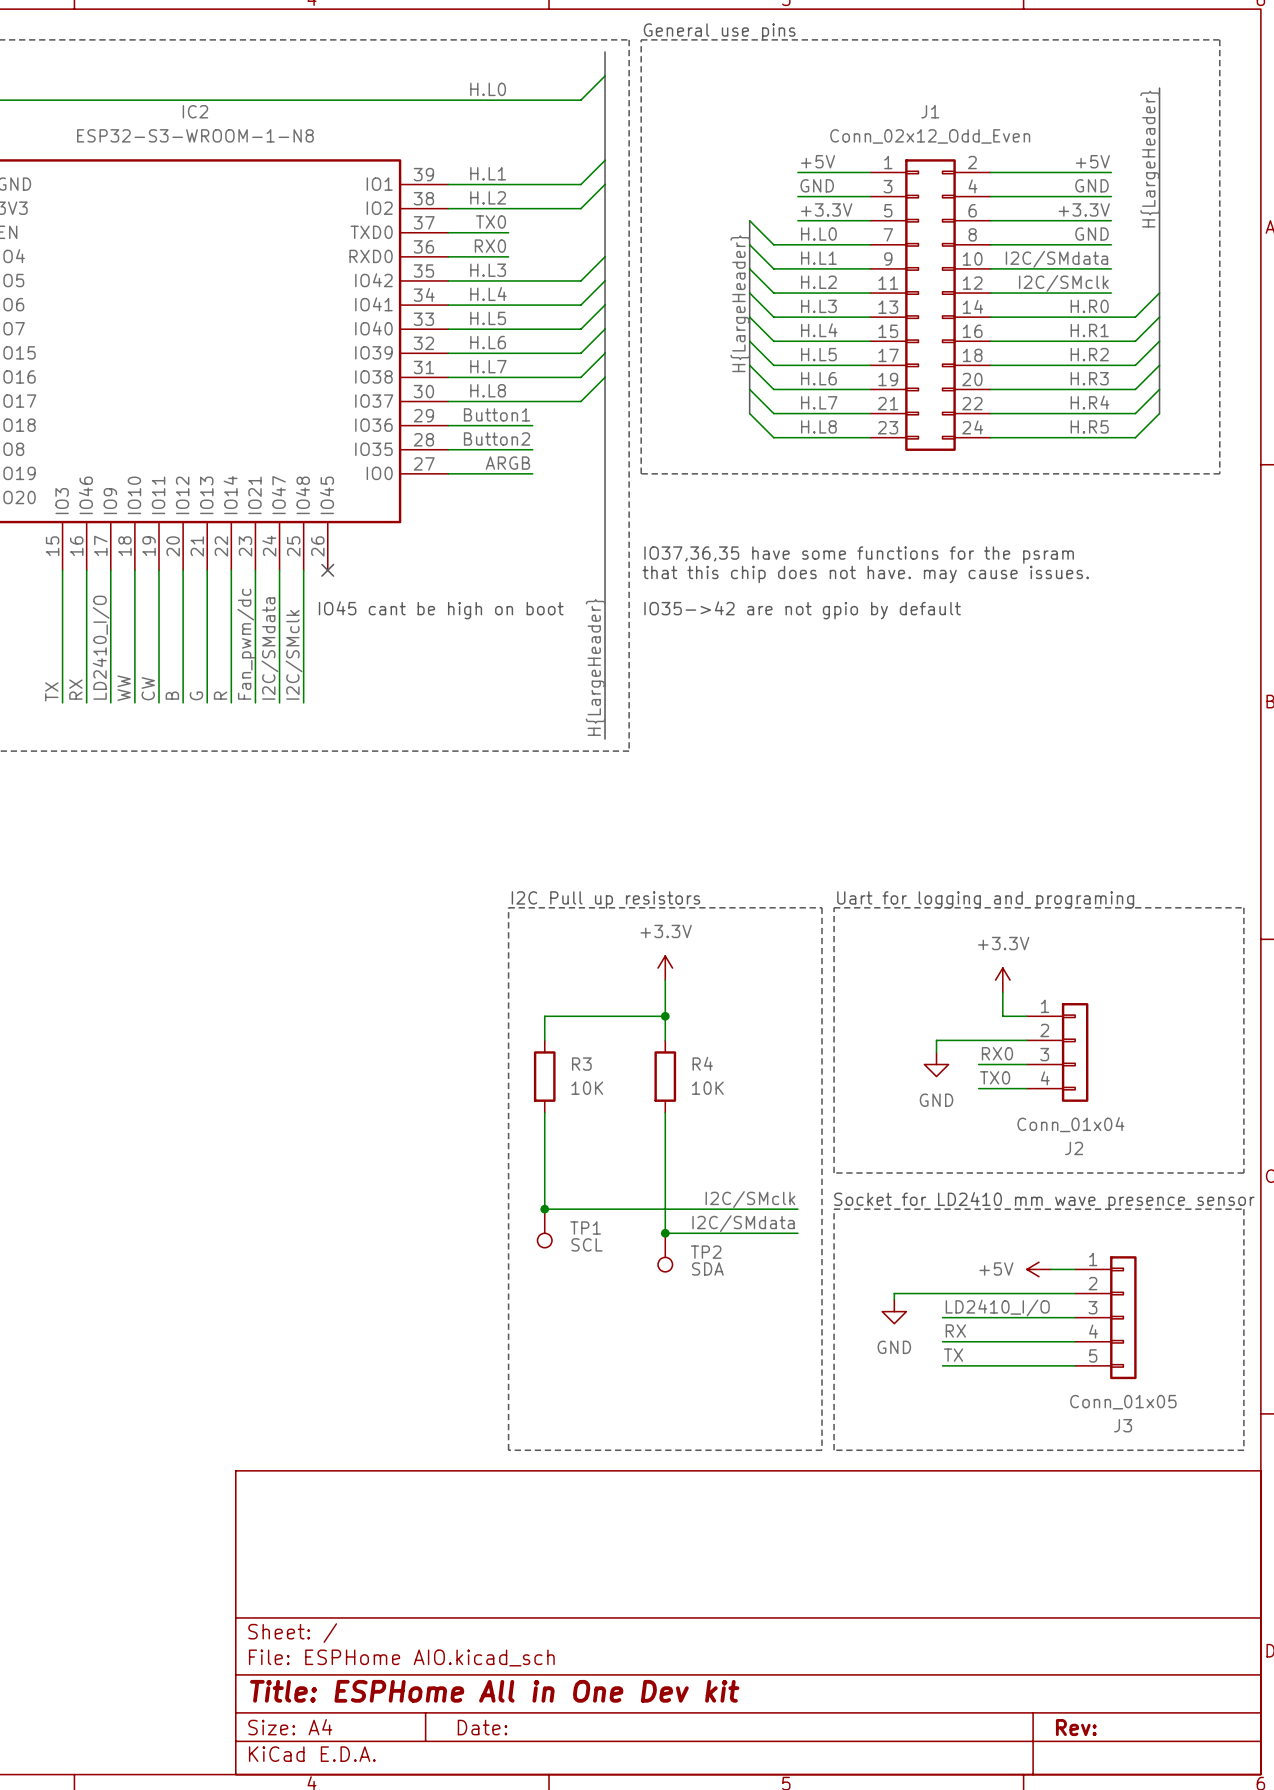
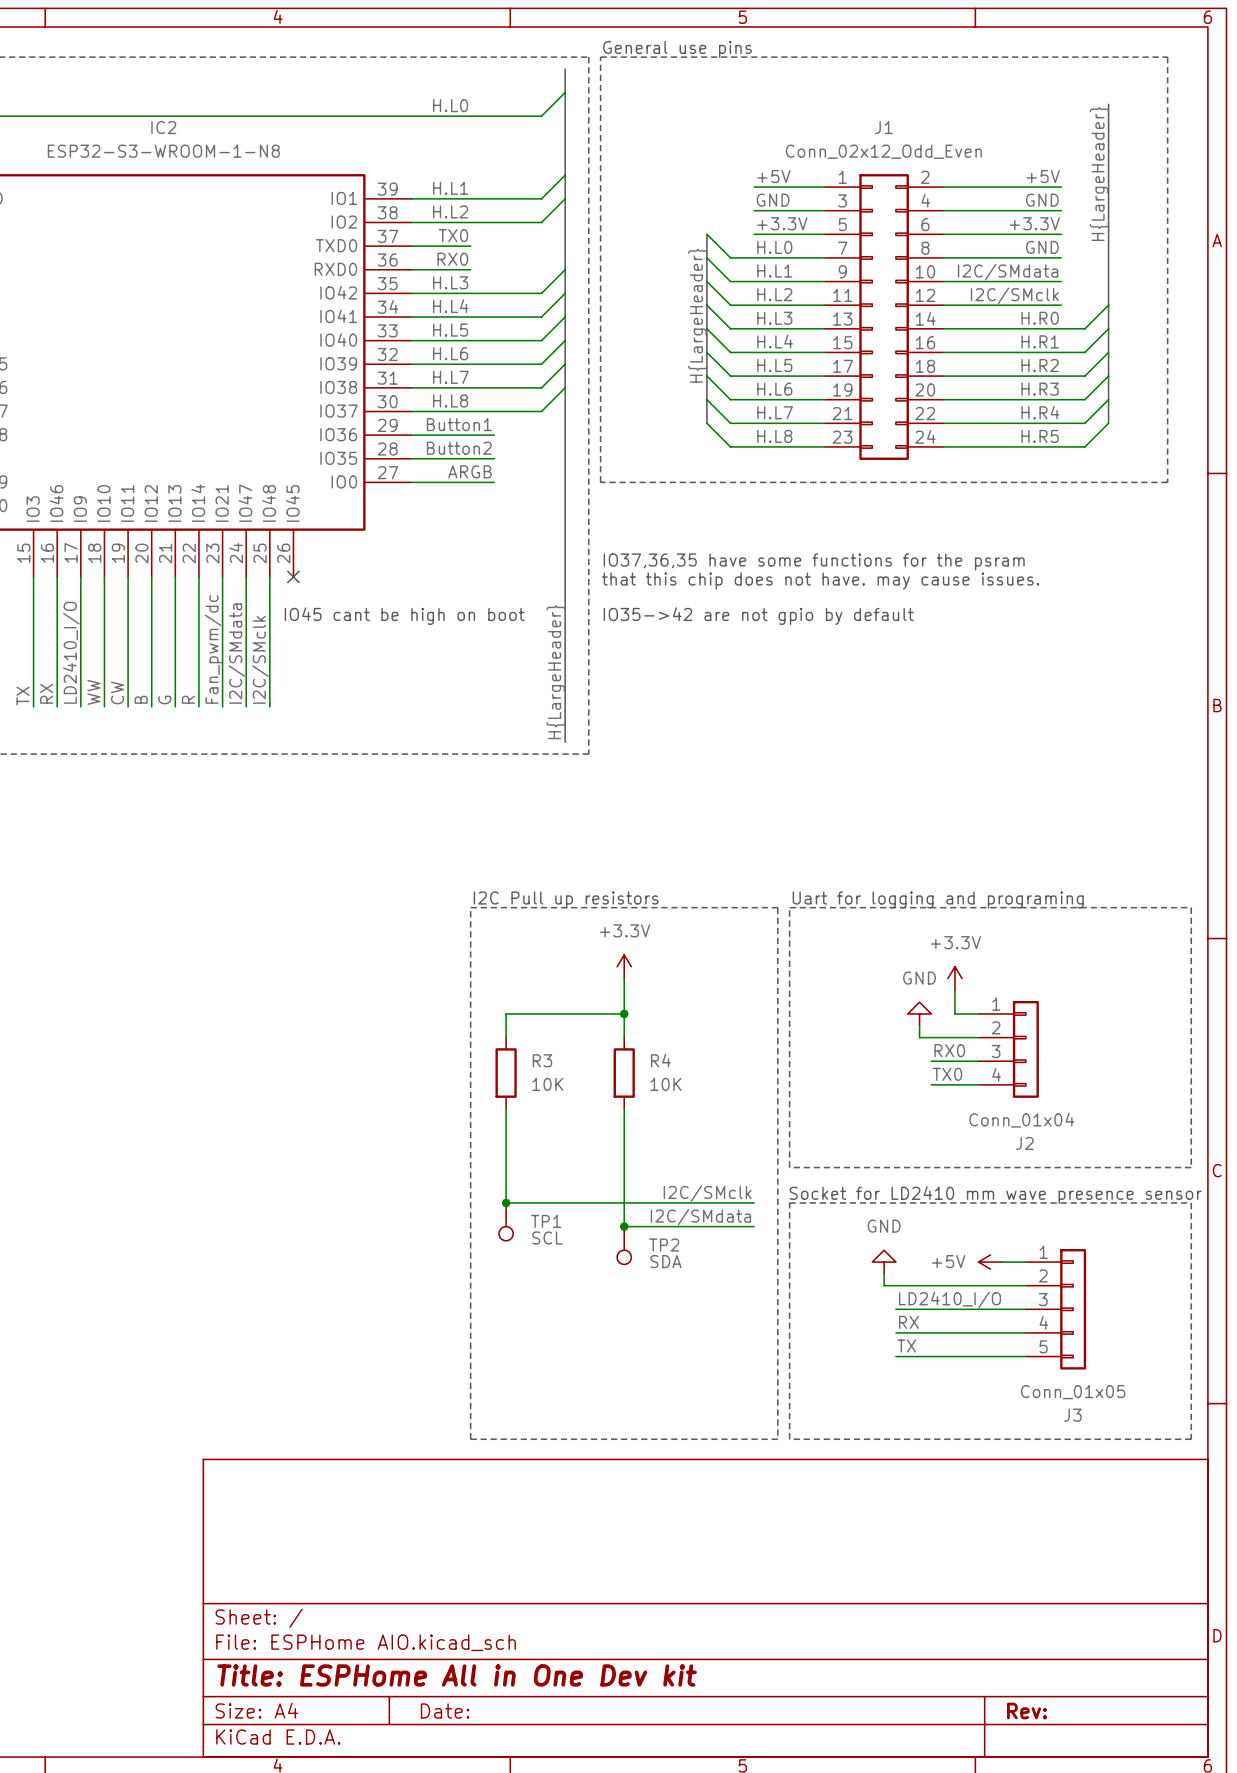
wire: (966, 1040) (936, 1040) (936, 1052) -> (919, 1037) (919, 1025)
power symbol rotation: 0° (936, 1064) -> 180° (919, 1013)
power symbol position: GND (936, 1064) -> GND (919, 1013)
wire: (930, 1293) (894, 1293) (894, 1299) -> (884, 1285) (884, 1273)
power symbol rotation: 0° (894, 1311) -> 180° (884, 1262)
power symbol position: GND (894, 1311) -> GND (884, 1262)

